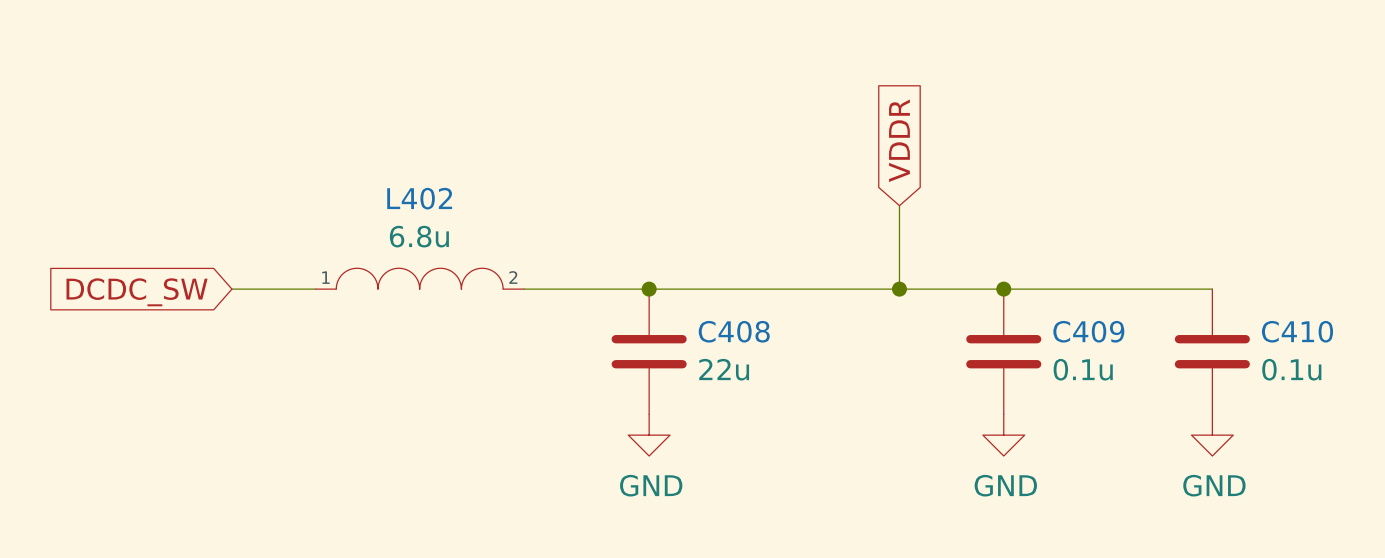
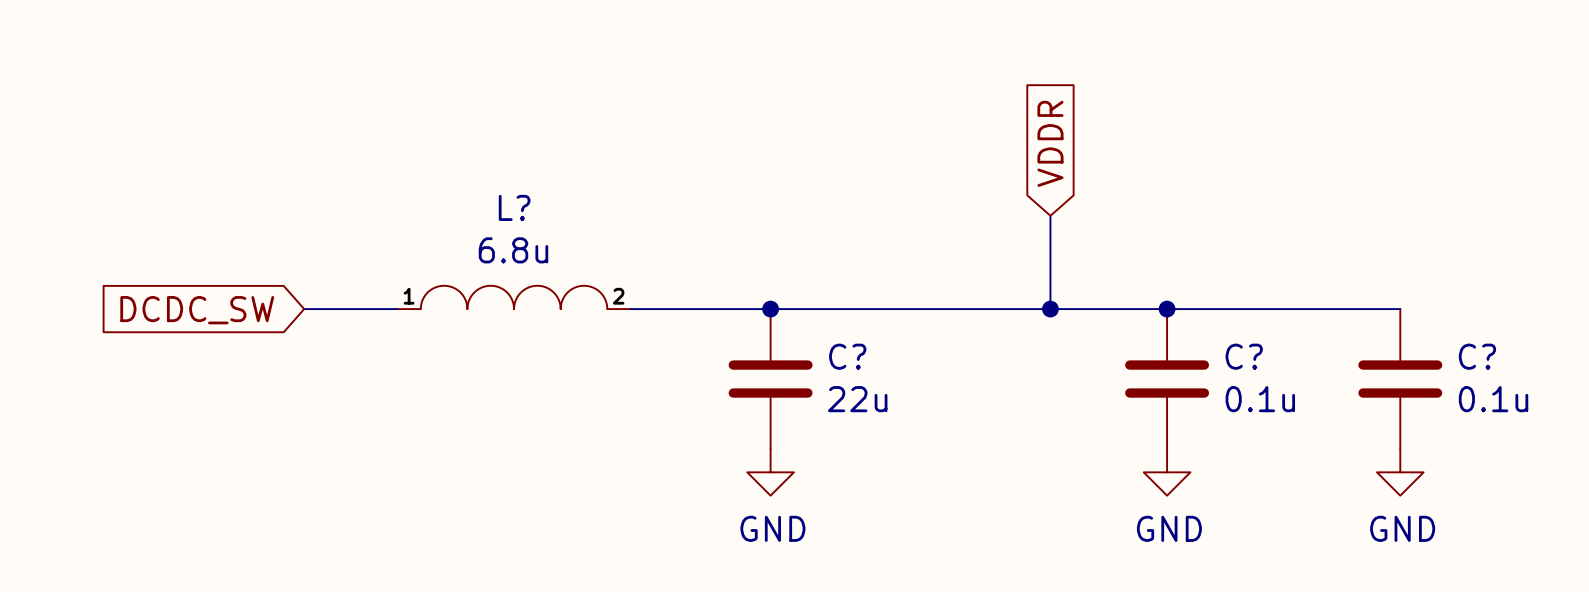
L402 name: L402 (419, 198) -> L? (514, 207)
C408 name: C408 (734, 331) -> C? (847, 356)
C409 name: C409 (1088, 331) -> C? (1244, 356)
C410 name: C410 (1297, 331) -> C? (1477, 356)

